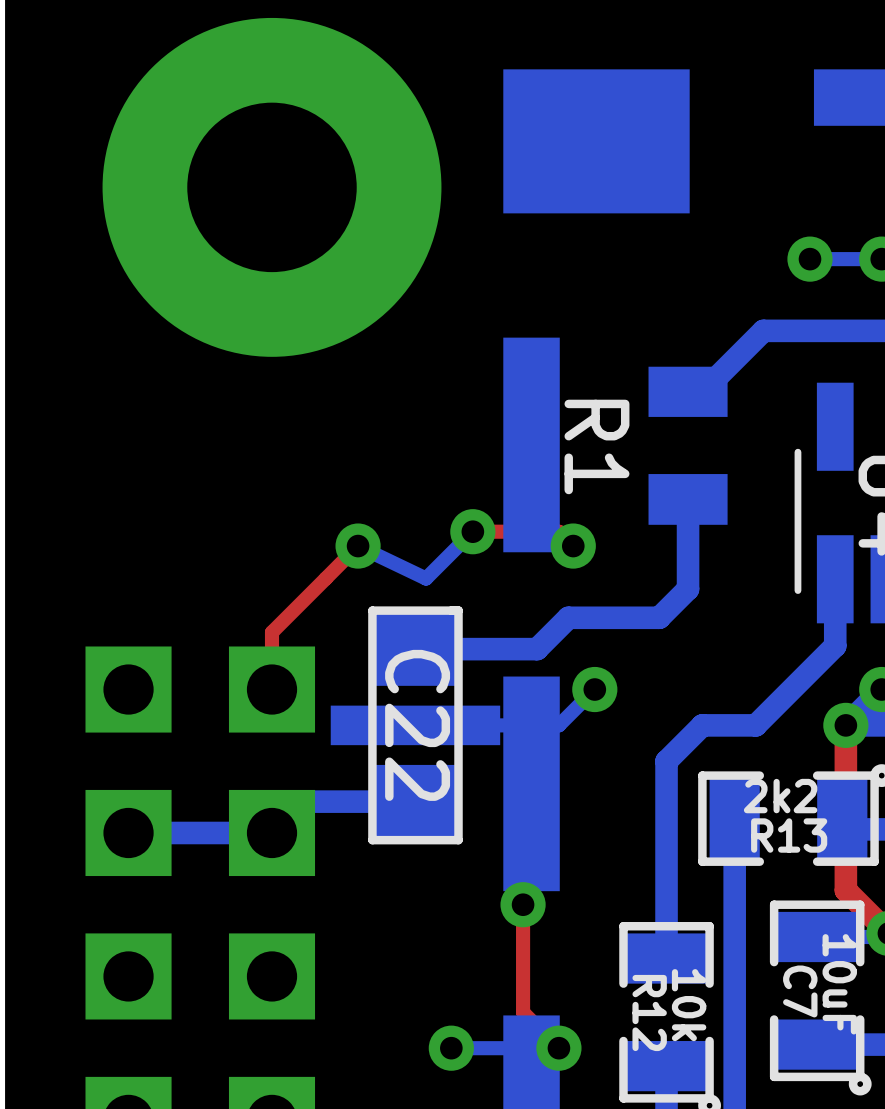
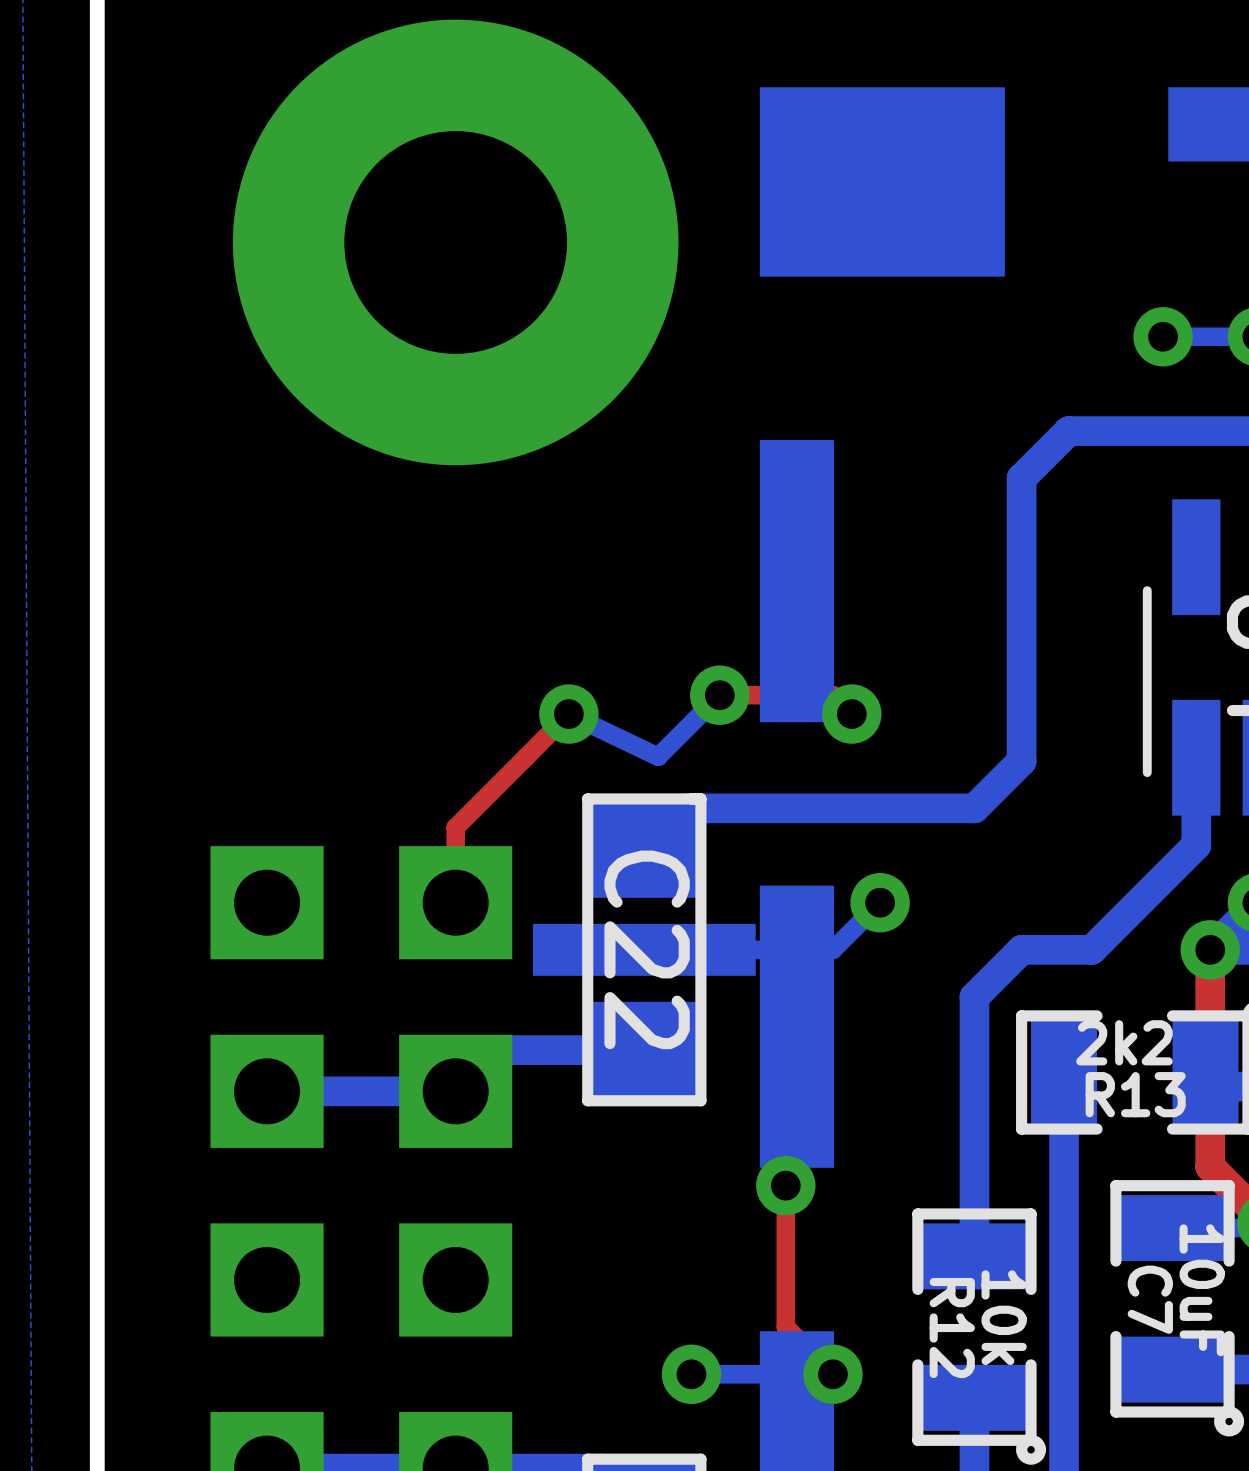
bottom track: (763, 330) (702, 391) (688, 391) -> none
R1: (688, 445) -> none
bottom track: (688, 499) (688, 589) (659, 617) -> (1101, 431) (1068, 431) (1021, 478) (1021, 761) (974, 808) (965, 808)
bottom track: (568, 617) (537, 649) (415, 649) -> (845, 808) (685, 808) (644, 849)

